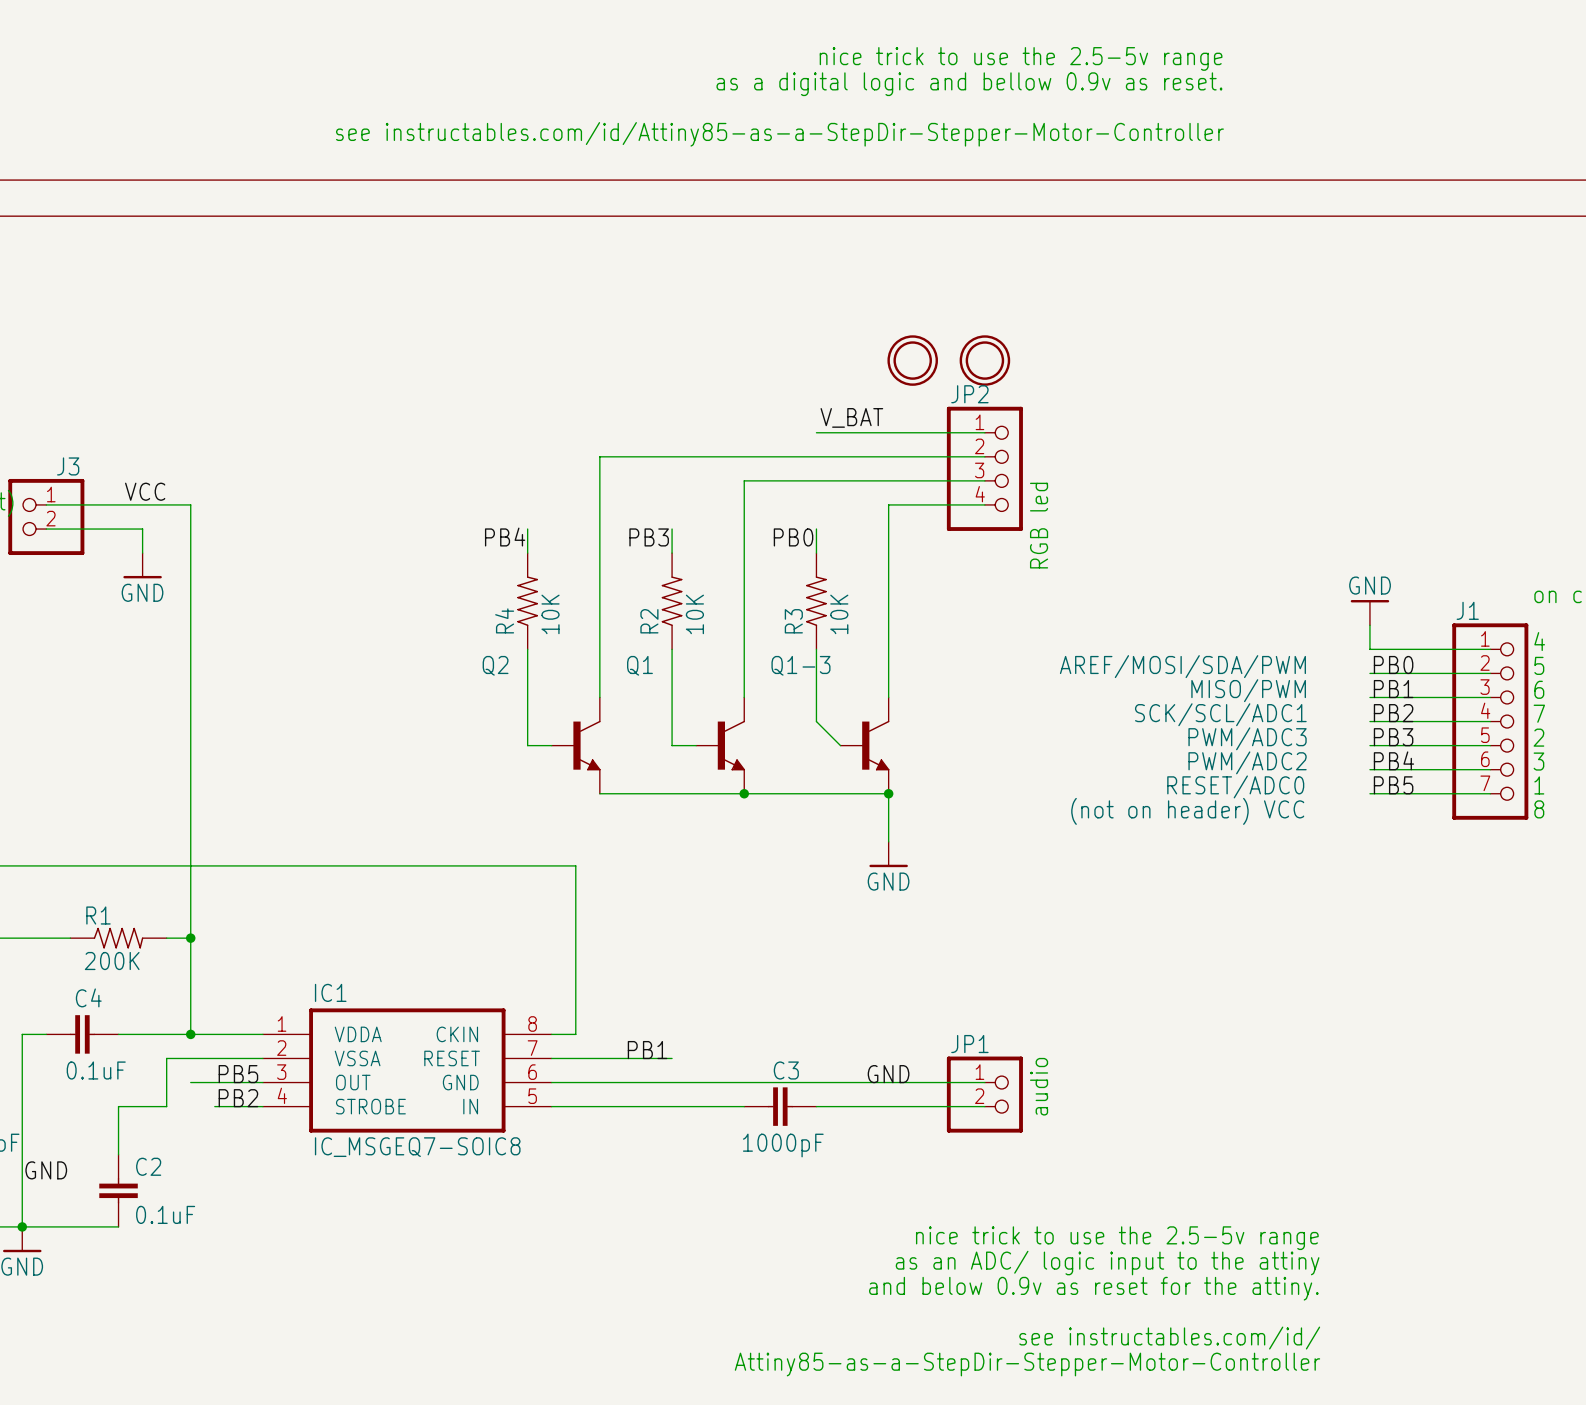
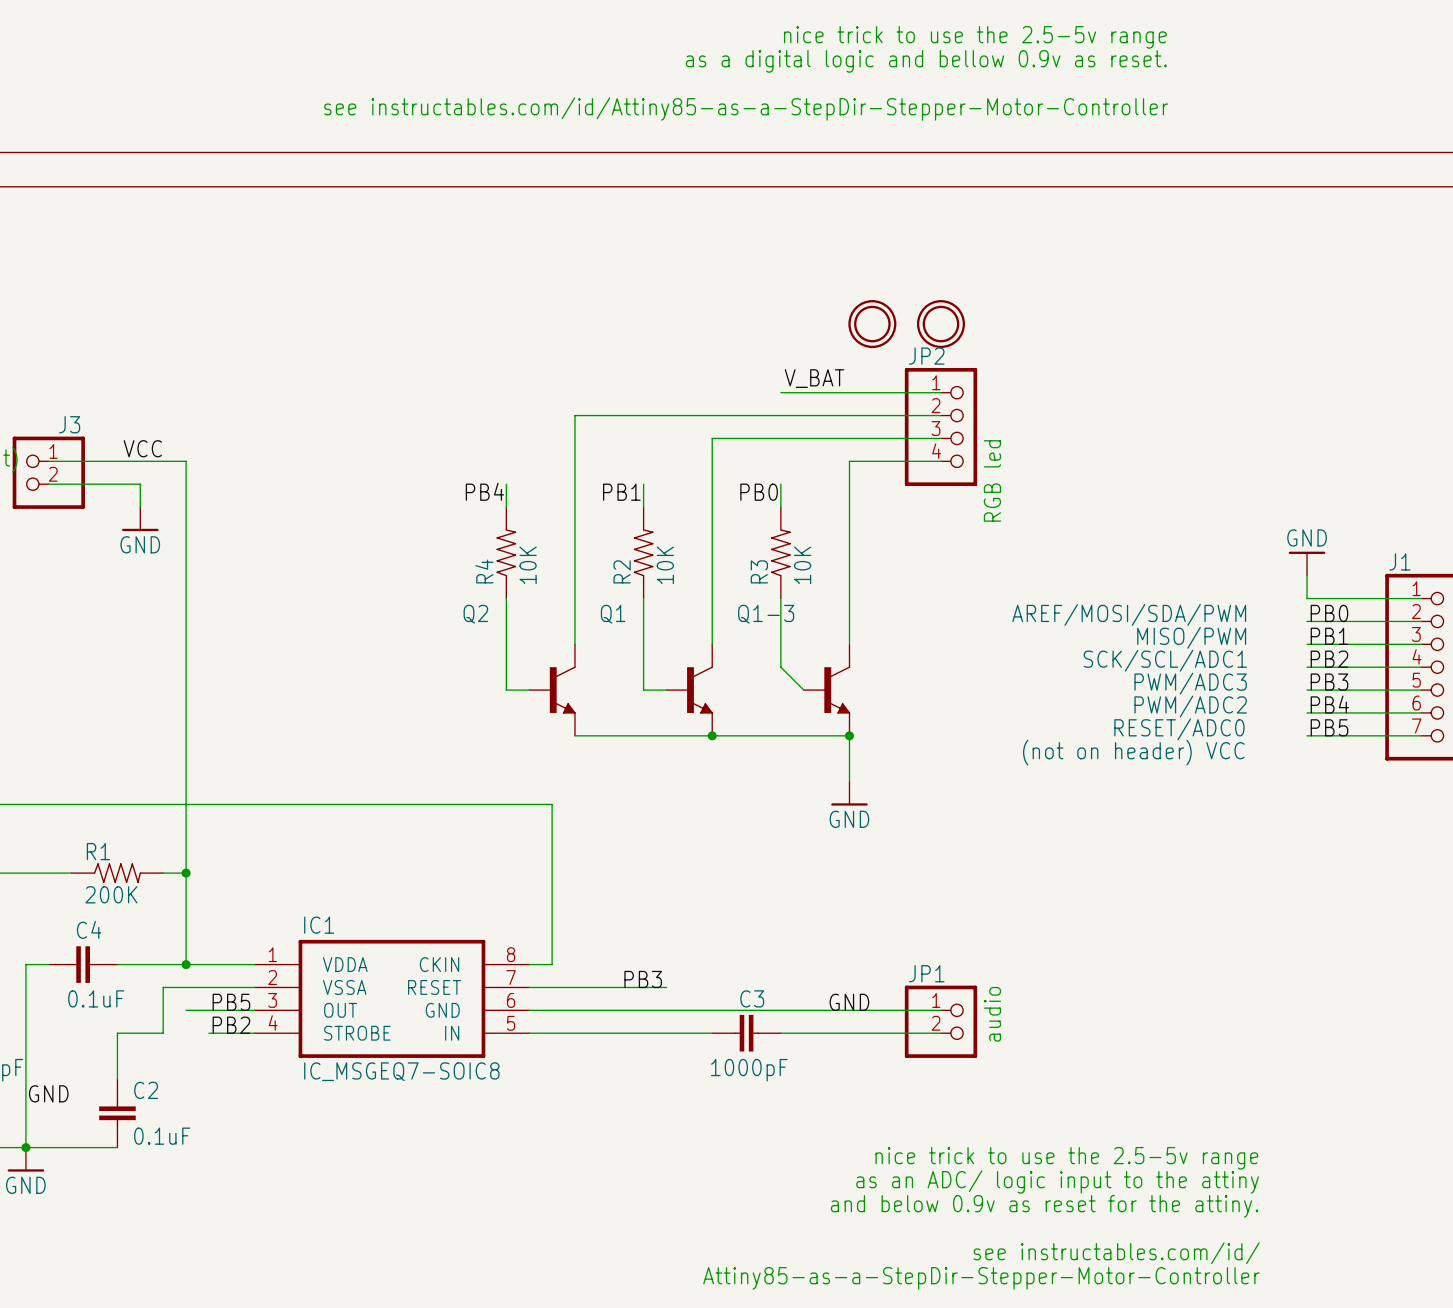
label: PB3 (649, 537) -> PB1 (621, 492)
label: PB1 (647, 1050) -> PB3 (643, 979)
wire: none -> (643, 987) (666, 987)

